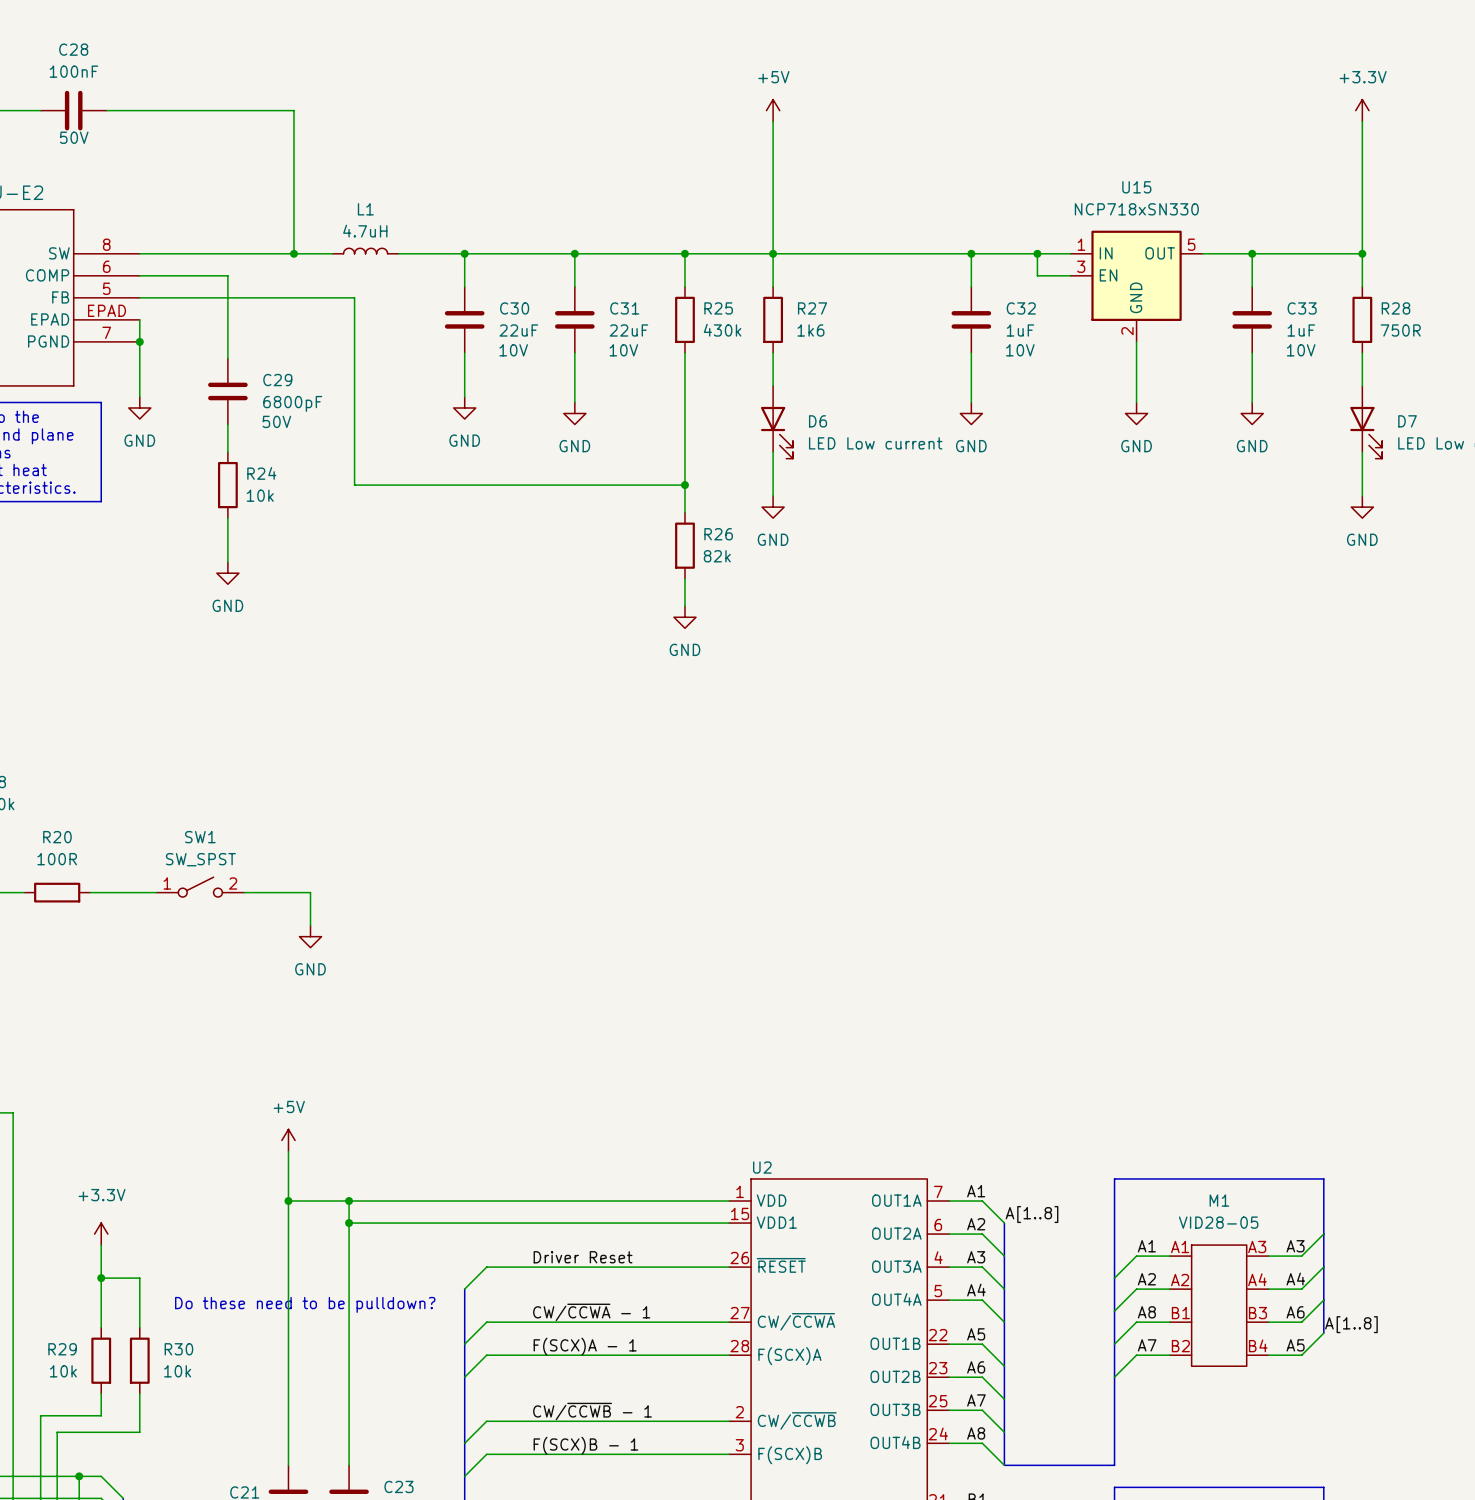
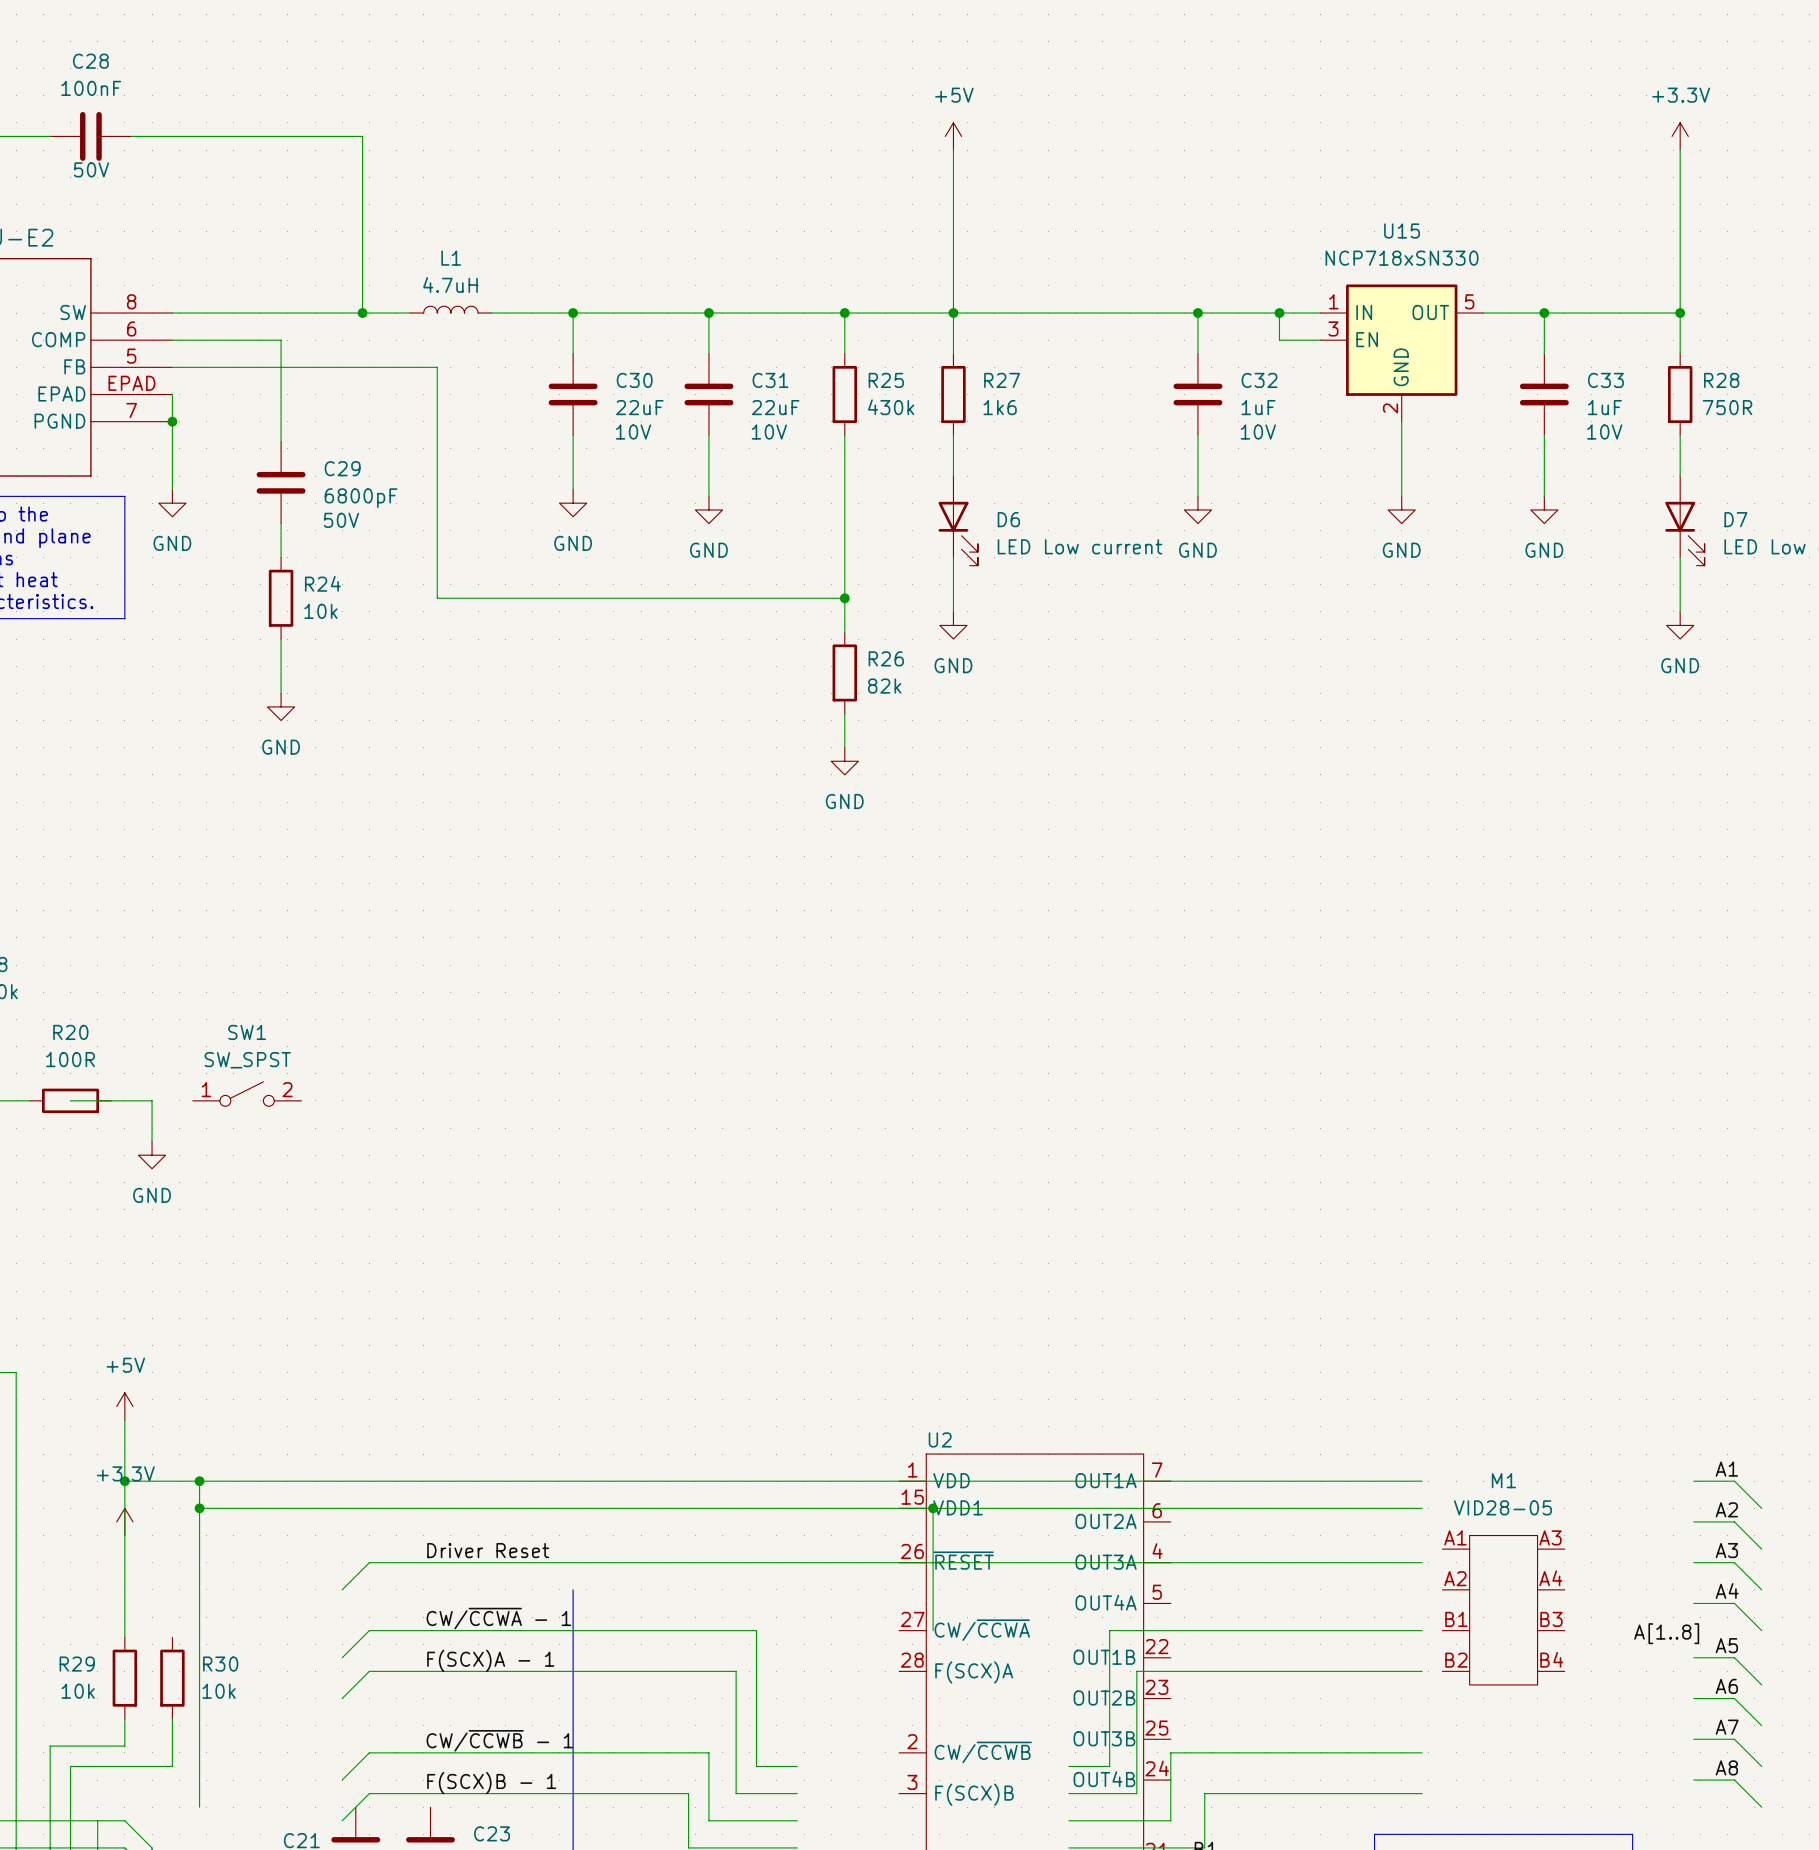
wire: none -> (70, 1100) (111, 1100)
wire: (123, 892) (156, 892) -> (152, 1100) (152, 1141)
wire: (244, 892) (310, 892) (310, 925) -> none
power symbol: none -> GND (152, 1155)
power symbol: GND (310, 936) -> none
power symbol position: +5V (288, 1140) -> +5V (124, 1406)
wire: none -> (124, 1420) (124, 1535)
wire: (288, 1151) (288, 1465) -> none
label: A1 (976, 1191) -> none
label: none -> A1 (1726, 1469)
wire: none -> (124, 1481) (355, 1481)
junction: none -> (124, 1481)
junction: none -> (199, 1481)
junction: (288, 1201) -> none
wire: (349, 1201) (349, 1465) -> (199, 1481) (199, 1807)
junction: (349, 1201) -> none
wire: none -> (899, 1481) (1170, 1481)
wire: (982, 1201) (1004, 1223) -> (1211, 1481) (1422, 1481)
wire: none -> (1693, 1481) (1734, 1481) (1761, 1508)
label: A[1..8] (1032, 1214) -> none
wire: none -> (199, 1508) (430, 1508)
junction: none -> (199, 1508)
junction: (349, 1223) -> none
wire: none -> (899, 1508) (1422, 1508)
wire: none -> (933, 1508) (933, 1630)
junction: none -> (933, 1508)
bus: (1004, 1223) (1004, 1465) (1114, 1465) (1114, 1178) (1323, 1178) (1323, 1333) -> none
label: A2 (976, 1224) -> none
label: none -> A2 (1726, 1509)
wire: (949, 1234) (982, 1234) (1004, 1256) -> none
wire: (1323, 1234) (1301, 1256) (1268, 1256) -> none
wire: none -> (1693, 1521) (1734, 1521) (1761, 1549)
label: A1 (1146, 1246) -> none
label position: A3 (1295, 1246) -> A3 (1726, 1550)
wire: (1169, 1256) (1136, 1256) (1114, 1278) -> none
label position: Driver Reset (583, 1257) -> Driver Reset (488, 1550)
label: A3 (976, 1257) -> none
wire: (486, 1267) (464, 1289) -> (600, 1562) (369, 1562) (342, 1589)
wire: none -> (899, 1562) (1170, 1562)
wire: (982, 1267) (1004, 1289) -> (1211, 1562) (1422, 1562)
wire: (1323, 1267) (1301, 1289) (1268, 1289) -> none
wire: none -> (1693, 1562) (1734, 1562) (1761, 1589)
wire: (101, 1278) (139, 1278) (139, 1327) -> none
junction: (101, 1278) -> none
label: A2 (1146, 1279) -> none
label position: A4 (1295, 1279) -> A4 (1727, 1591)
wire: (1169, 1289) (1136, 1289) (1114, 1311) -> none
label: A4 (976, 1290) -> none
wire: (949, 1300) (982, 1300) (1004, 1322) -> none
wire: (1323, 1300) (1301, 1322) (1268, 1322) -> none
wire: none -> (1693, 1603) (1734, 1603) (1761, 1630)
text: Do these need to be pulldown? (305, 1304) -> none
label position: CW/~{CCWA} - 1 (591, 1312) -> CW/~{CCWA} - 1 (498, 1618)
label: A8 (1146, 1312) -> none
label position: A6 (1295, 1312) -> A6 (1726, 1686)
wire: (486, 1322) (464, 1344) -> (600, 1630) (369, 1630) (342, 1657)
wire: (613, 1322) (729, 1322) -> (756, 1630) (756, 1766) (797, 1766)
wire: (1136, 1322) (1114, 1344) -> (1401, 1630) (1109, 1630) (1109, 1766) (1068, 1766)
wire: (1153, 1322) (1169, 1322) -> none
wire: (1323, 1333) (1301, 1355) (1268, 1355) -> none
label: A5 (976, 1334) -> none
wire: (949, 1344) (982, 1344) (1004, 1366) -> none
wire: none -> (1693, 1657) (1734, 1657) (1761, 1684)
label: A7 (1147, 1345) -> none
label position: A5 (1295, 1345) -> A5 (1726, 1645)
label position: F(SCX)A - 1 (585, 1346) -> F(SCX)A - 1 (490, 1660)
wire: (486, 1355) (464, 1377) -> (600, 1671) (369, 1671) (342, 1698)
wire: (596, 1355) (729, 1355) -> (736, 1671) (736, 1793)
wire: (1136, 1355) (1114, 1377) -> (1401, 1671) (1136, 1671) (1136, 1793) (1068, 1793)
wire: (1153, 1355) (1169, 1355) -> none
label: A6 (976, 1367) -> none
wire: (949, 1377) (982, 1377) (1004, 1399) -> none
wire: none -> (1693, 1698) (1734, 1698) (1761, 1725)
label: A7 (976, 1400) -> none
label: none -> A7 (1727, 1727)
wire: (949, 1410) (982, 1410) (1004, 1432) -> none
wire: none -> (1693, 1739) (1734, 1739) (1761, 1766)
label position: CW/~{CCWB} - 1 (592, 1411) -> CW/~{CCWB} - 1 (499, 1740)
wire: (486, 1421) (464, 1443) -> (600, 1752) (369, 1752) (342, 1780)
wire: (574, 1421) (729, 1421) -> (708, 1752) (708, 1820) (797, 1820)
wire: none -> (1422, 1752) (1170, 1752) (1170, 1820) (1068, 1820)
label: A8 (976, 1433) -> none
label: none -> A8 (1726, 1767)
wire: (949, 1443) (982, 1443) (1004, 1465) -> none
wire: none -> (1693, 1780) (1734, 1780) (1761, 1807)
label position: F(SCX)B - 1 (585, 1445) -> F(SCX)B - 1 (491, 1783)
wire: (486, 1454) (464, 1476) -> (600, 1793) (369, 1793) (342, 1820)
wire: (558, 1454) (596, 1454) -> (688, 1793) (688, 1847) (797, 1847)
wire: (646, 1454) (729, 1454) -> none
wire: none -> (1422, 1793) (1204, 1793) (1204, 1847) (1068, 1847)
junction: (79, 1476) -> none

